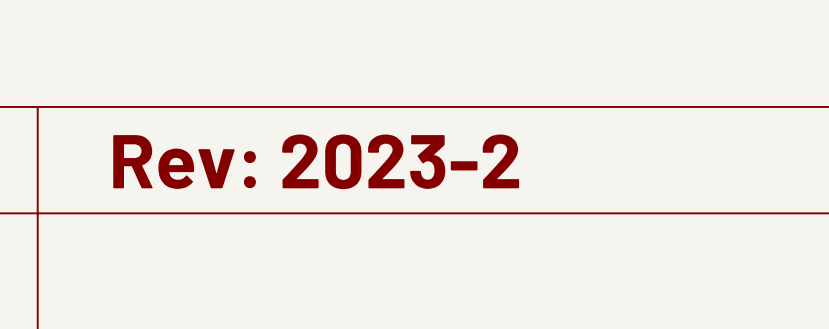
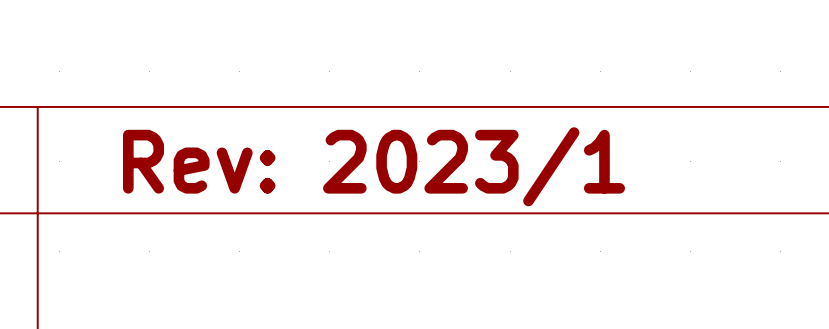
title block: Rev: 2023-2 (316, 161) -> Rev: 2023/1 (373, 166)

